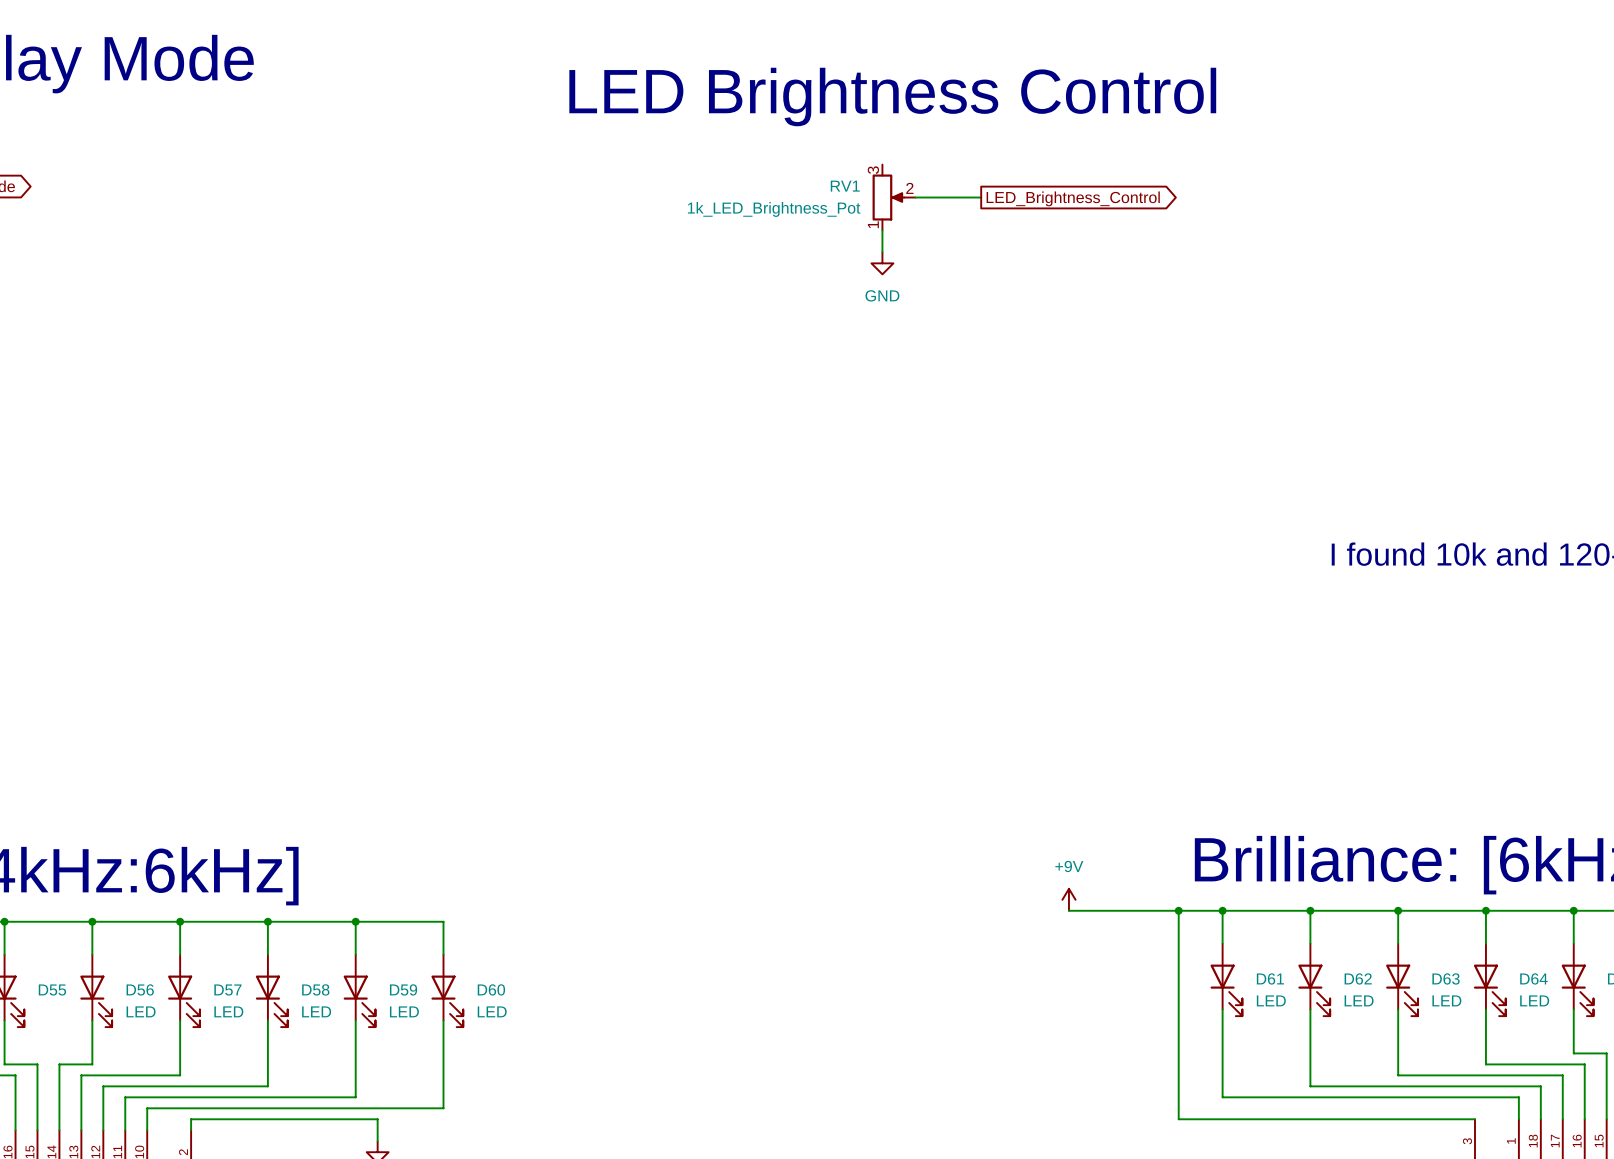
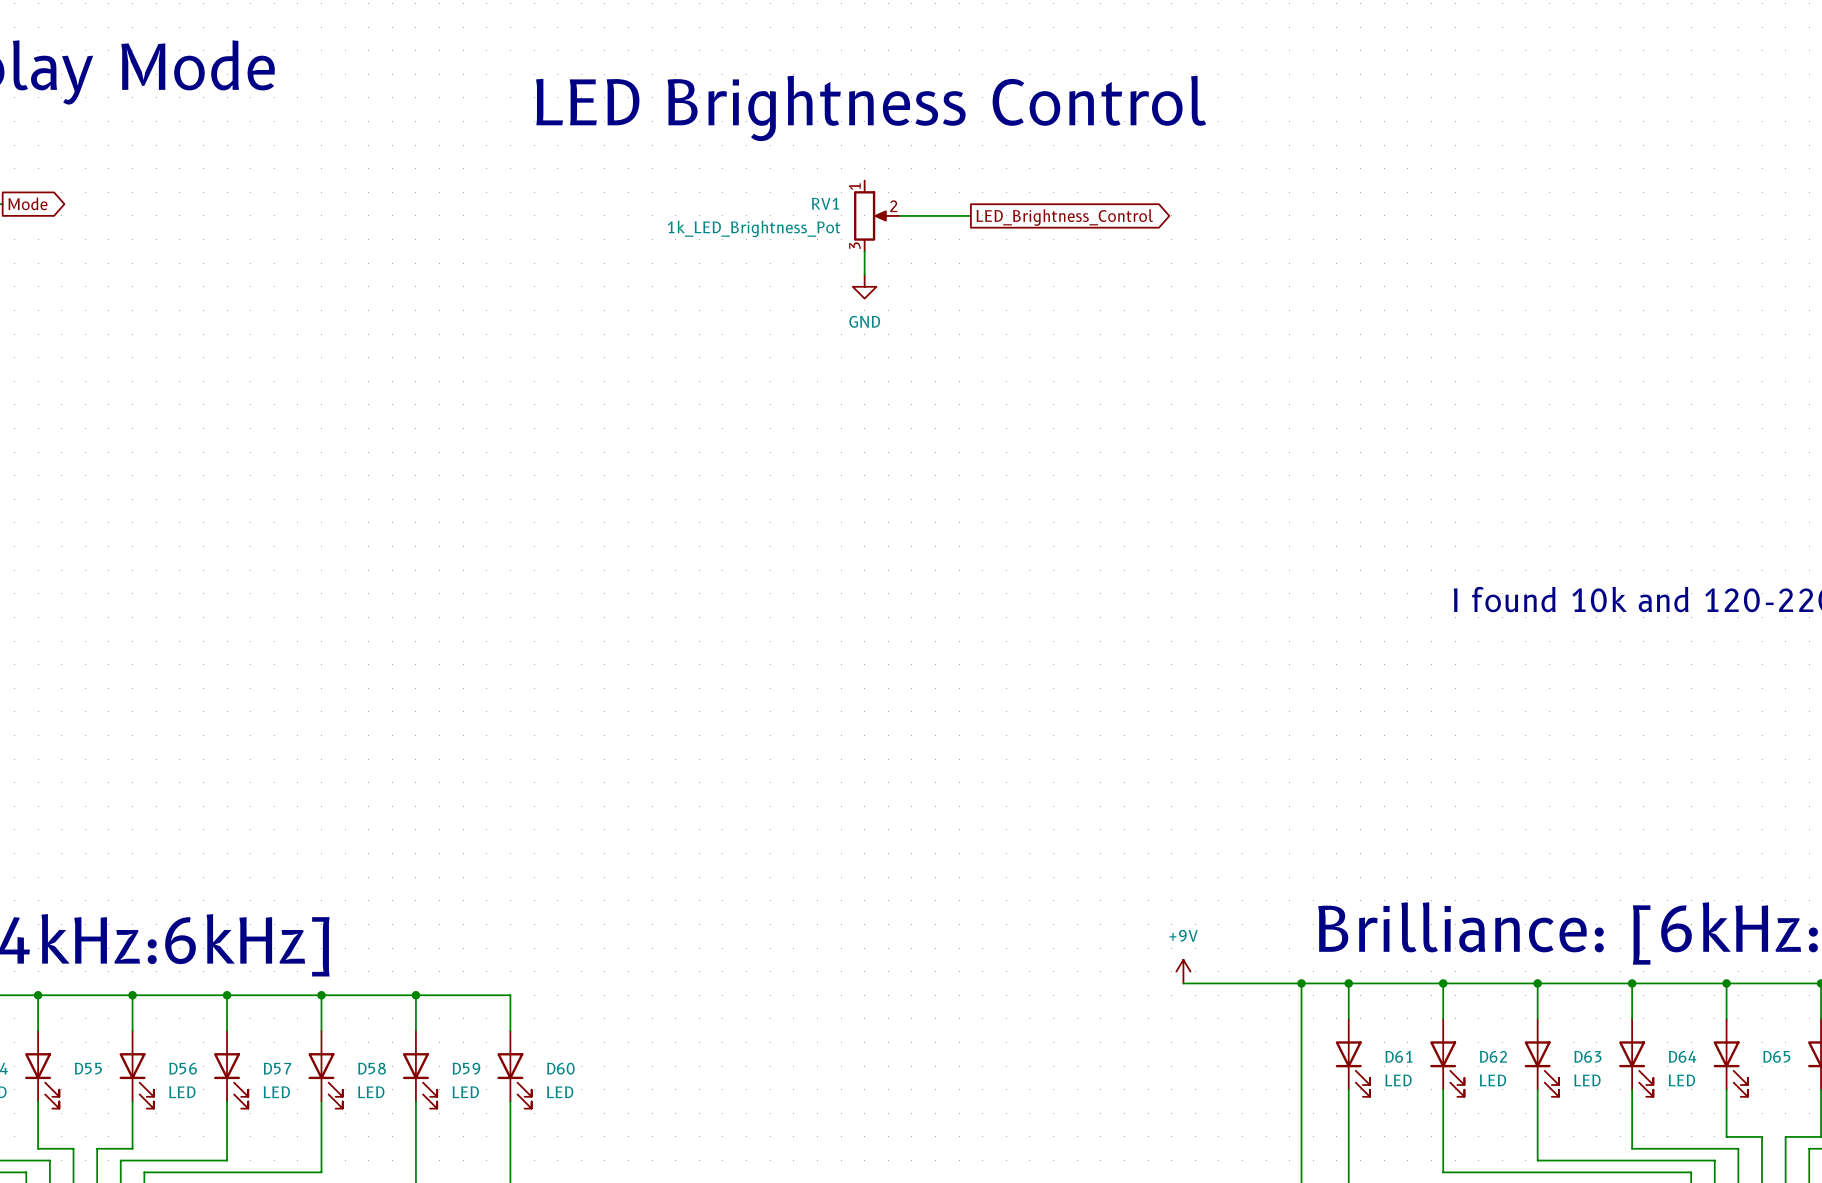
text: none -> LED Brightness Control (871, 108)
text: LED Brightness Control (892, 97) -> none
RV1 flip: as is (888, 197) -> up-down (871, 215)
RV1 position: (893, 197) -> (877, 215)
wire: (915, 197) (981, 197) -> (900, 215) (970, 215)
global label position: LED_Brightness_Control (1073, 198) -> LED_Brightness_Control (1064, 217)
wire: (882, 230) (882, 252) -> (864, 251) (864, 274)
power symbol position: GND (882, 263) -> GND (864, 286)

